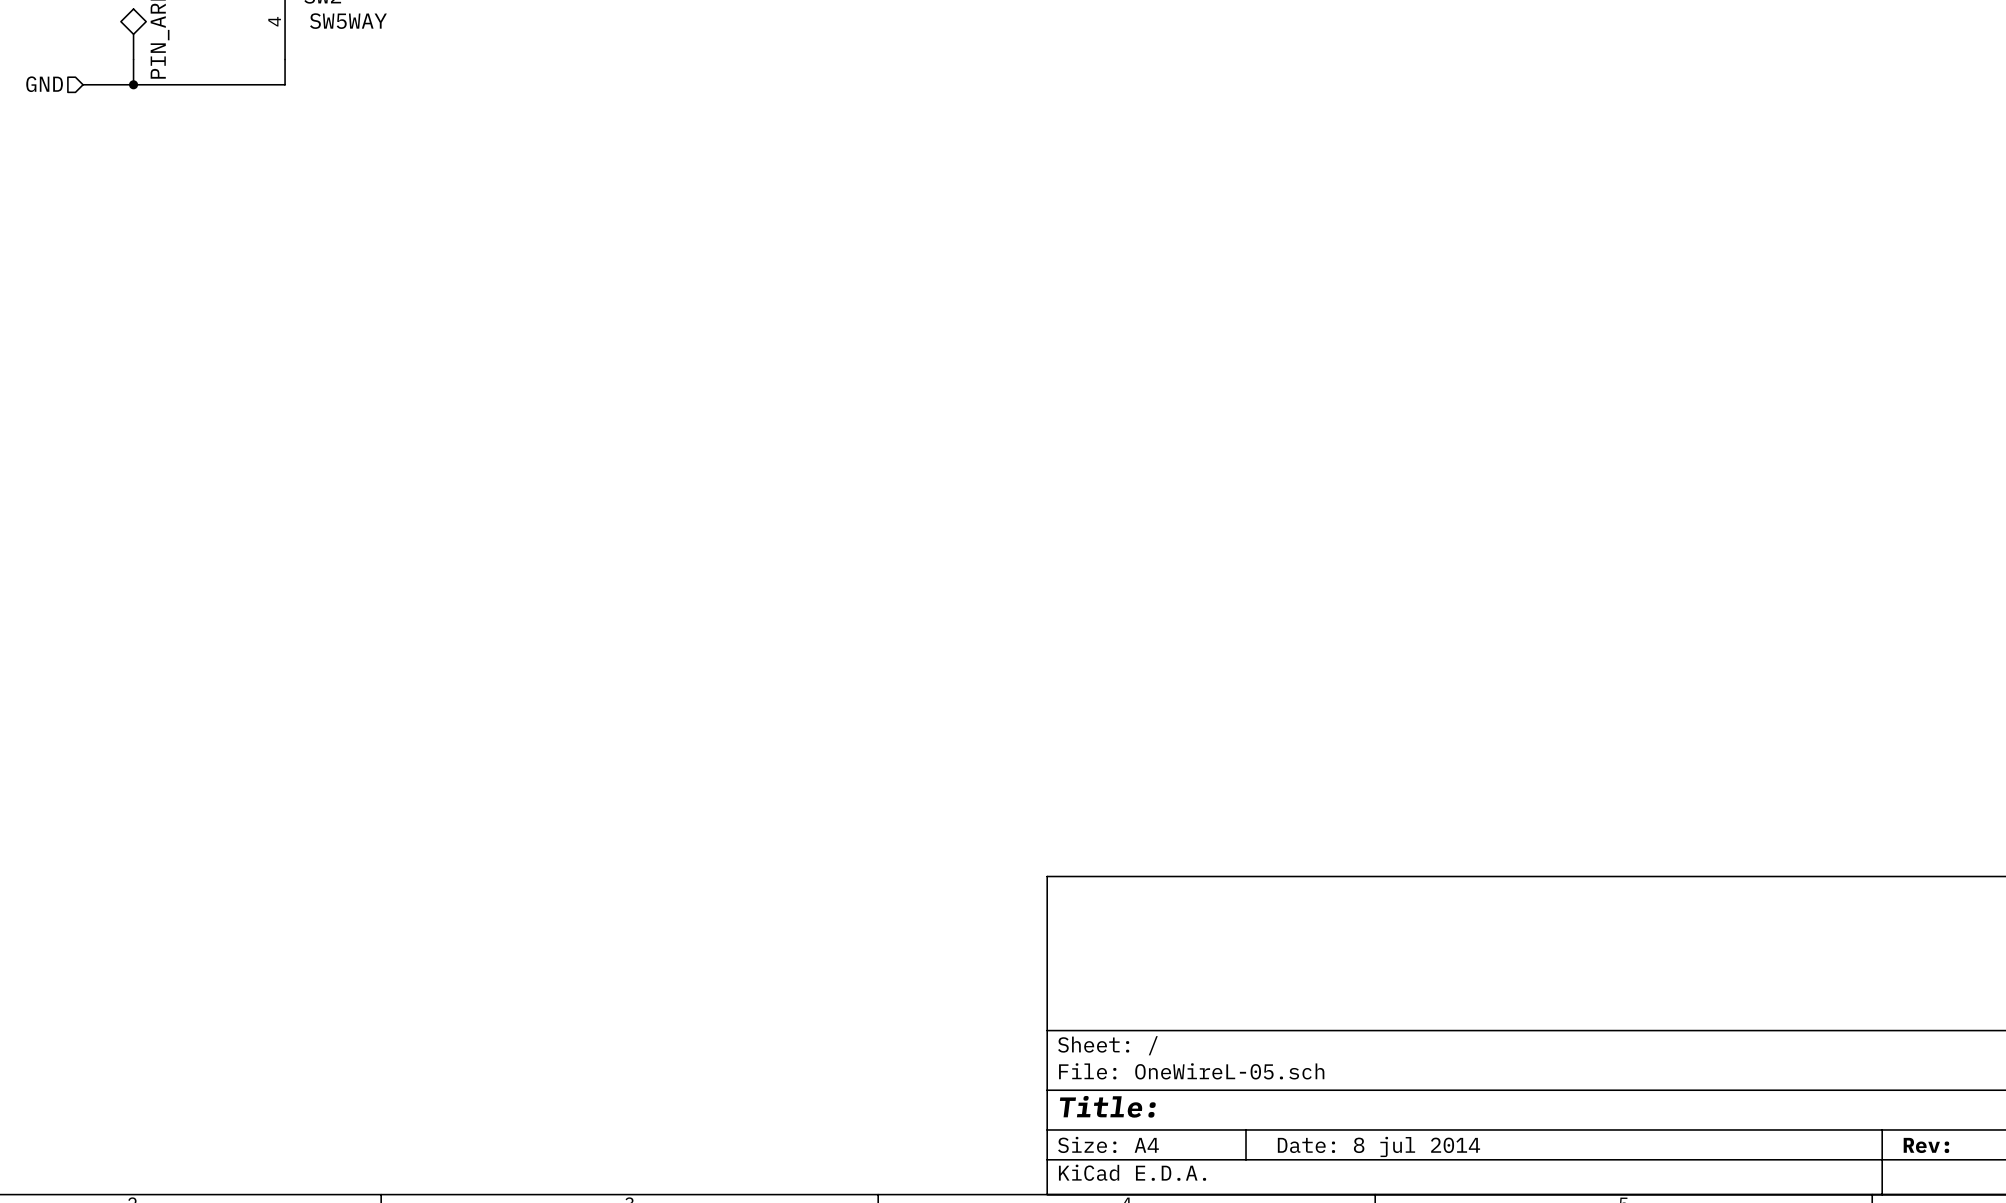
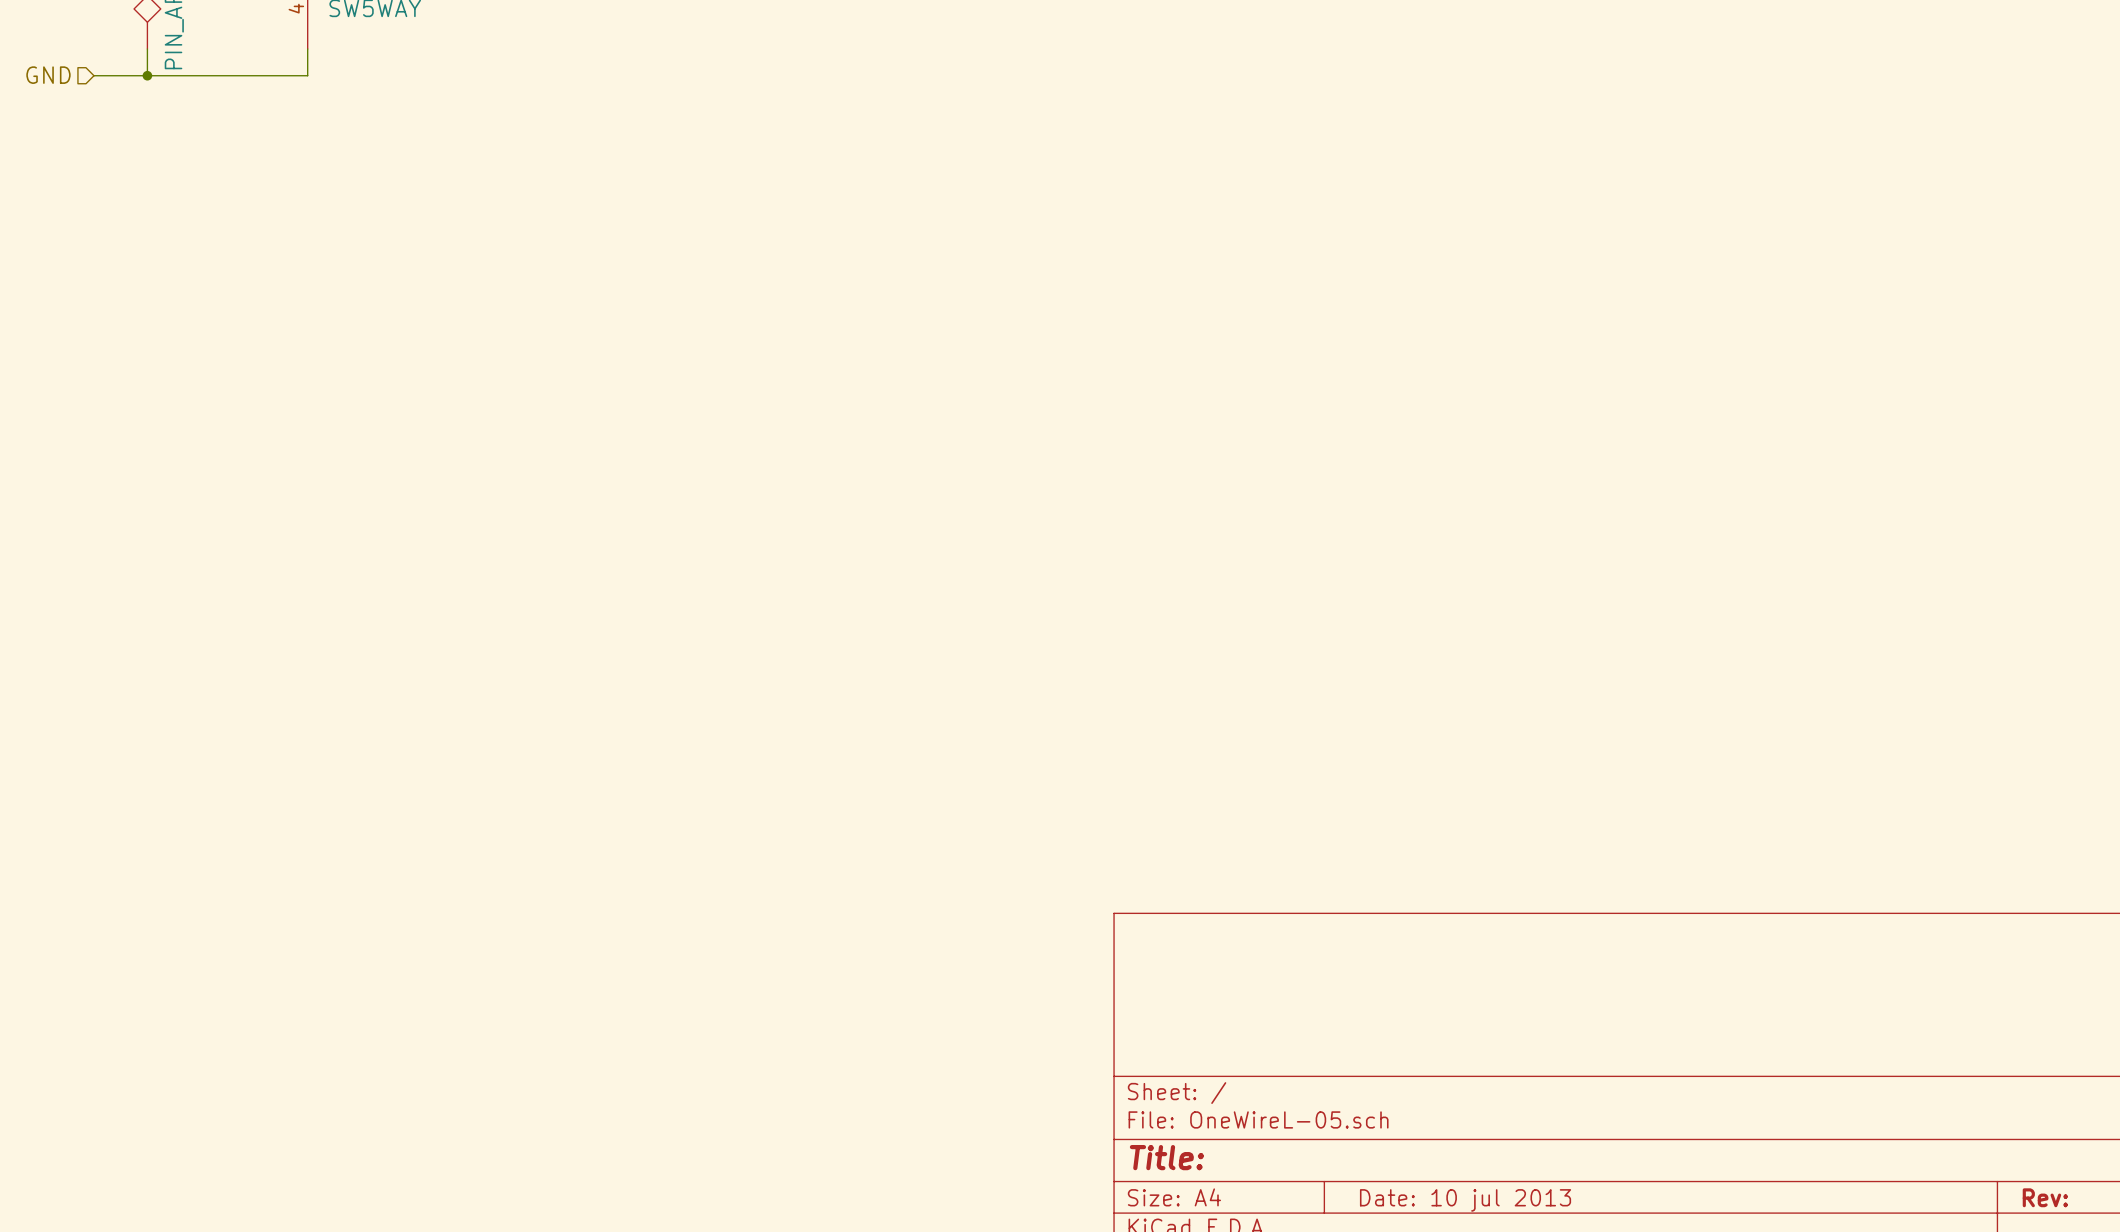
title block: Date: 8 jul 2014 (1378, 1146) -> Date: 10 jul 2013 (1465, 1200)

